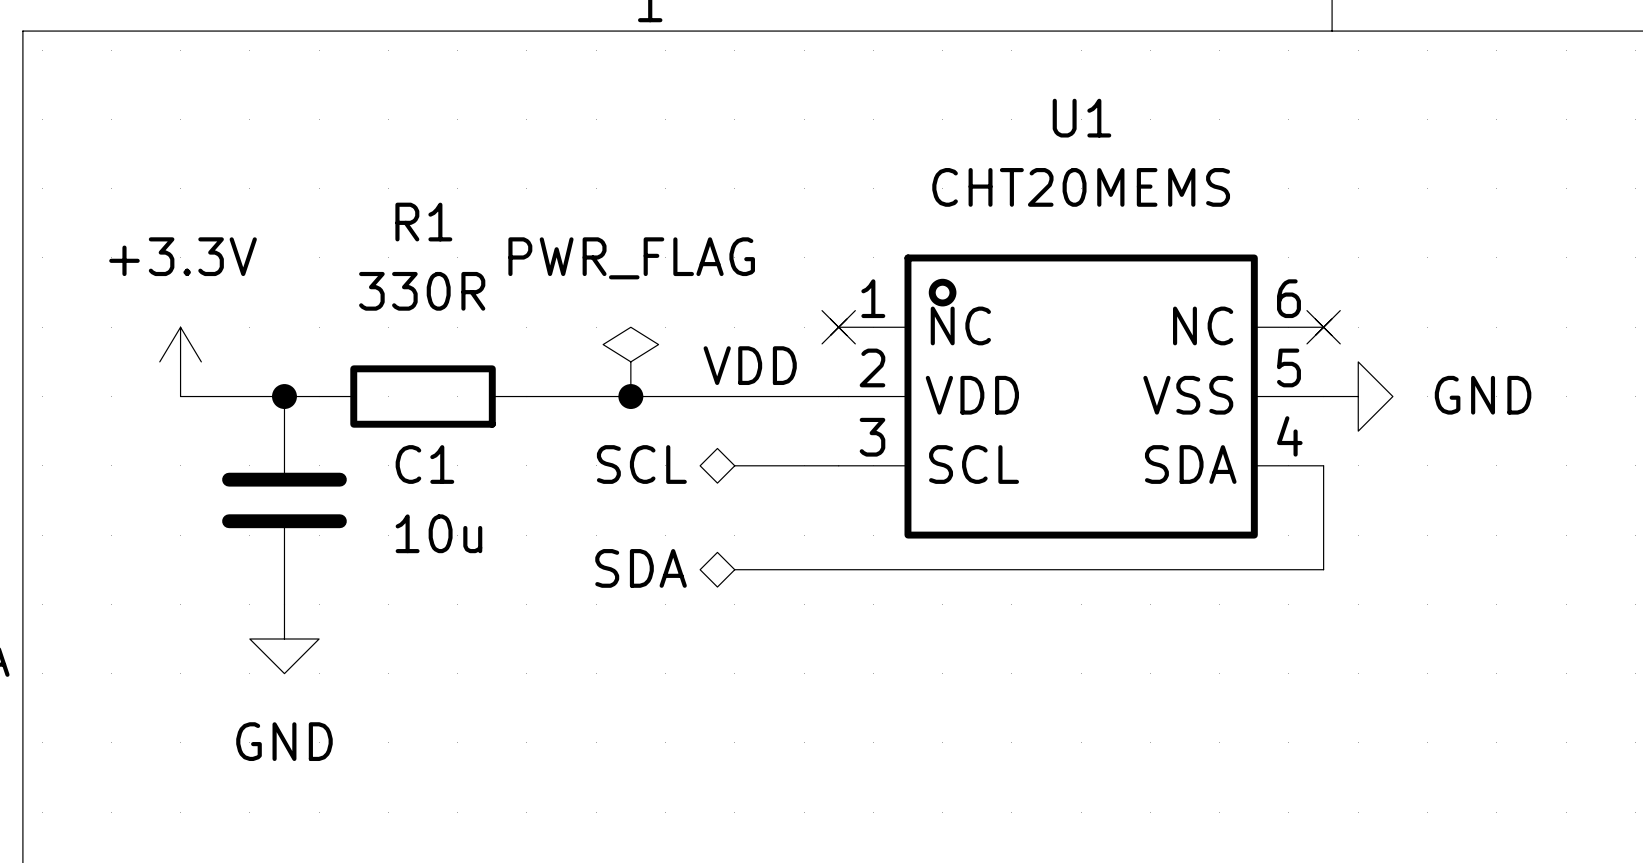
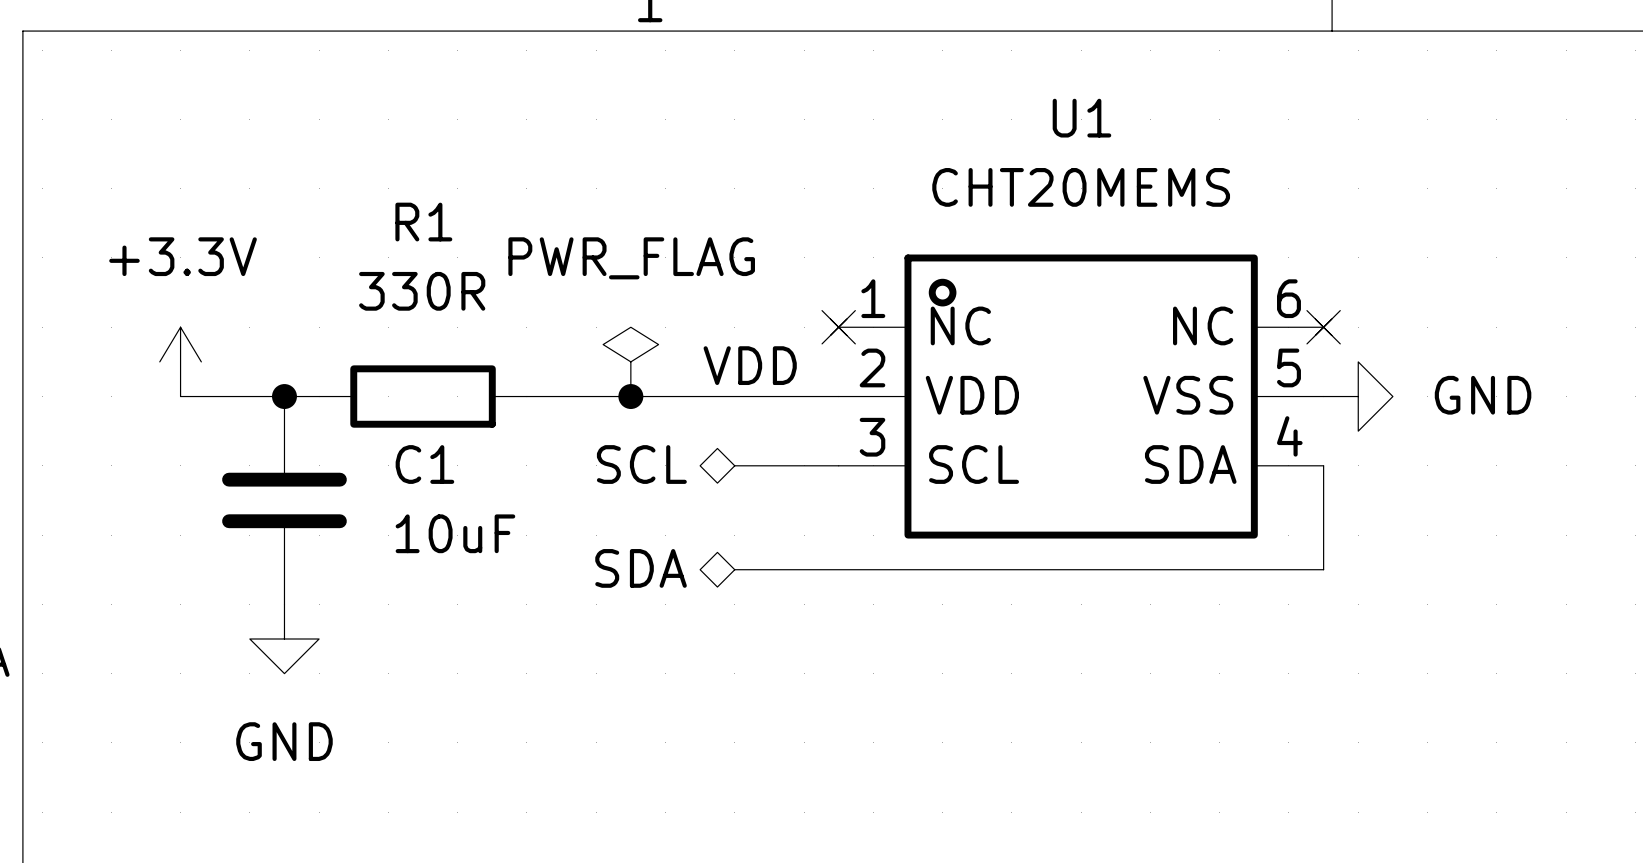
C1 value: 10u (438, 533) -> 10uF (455, 533)

